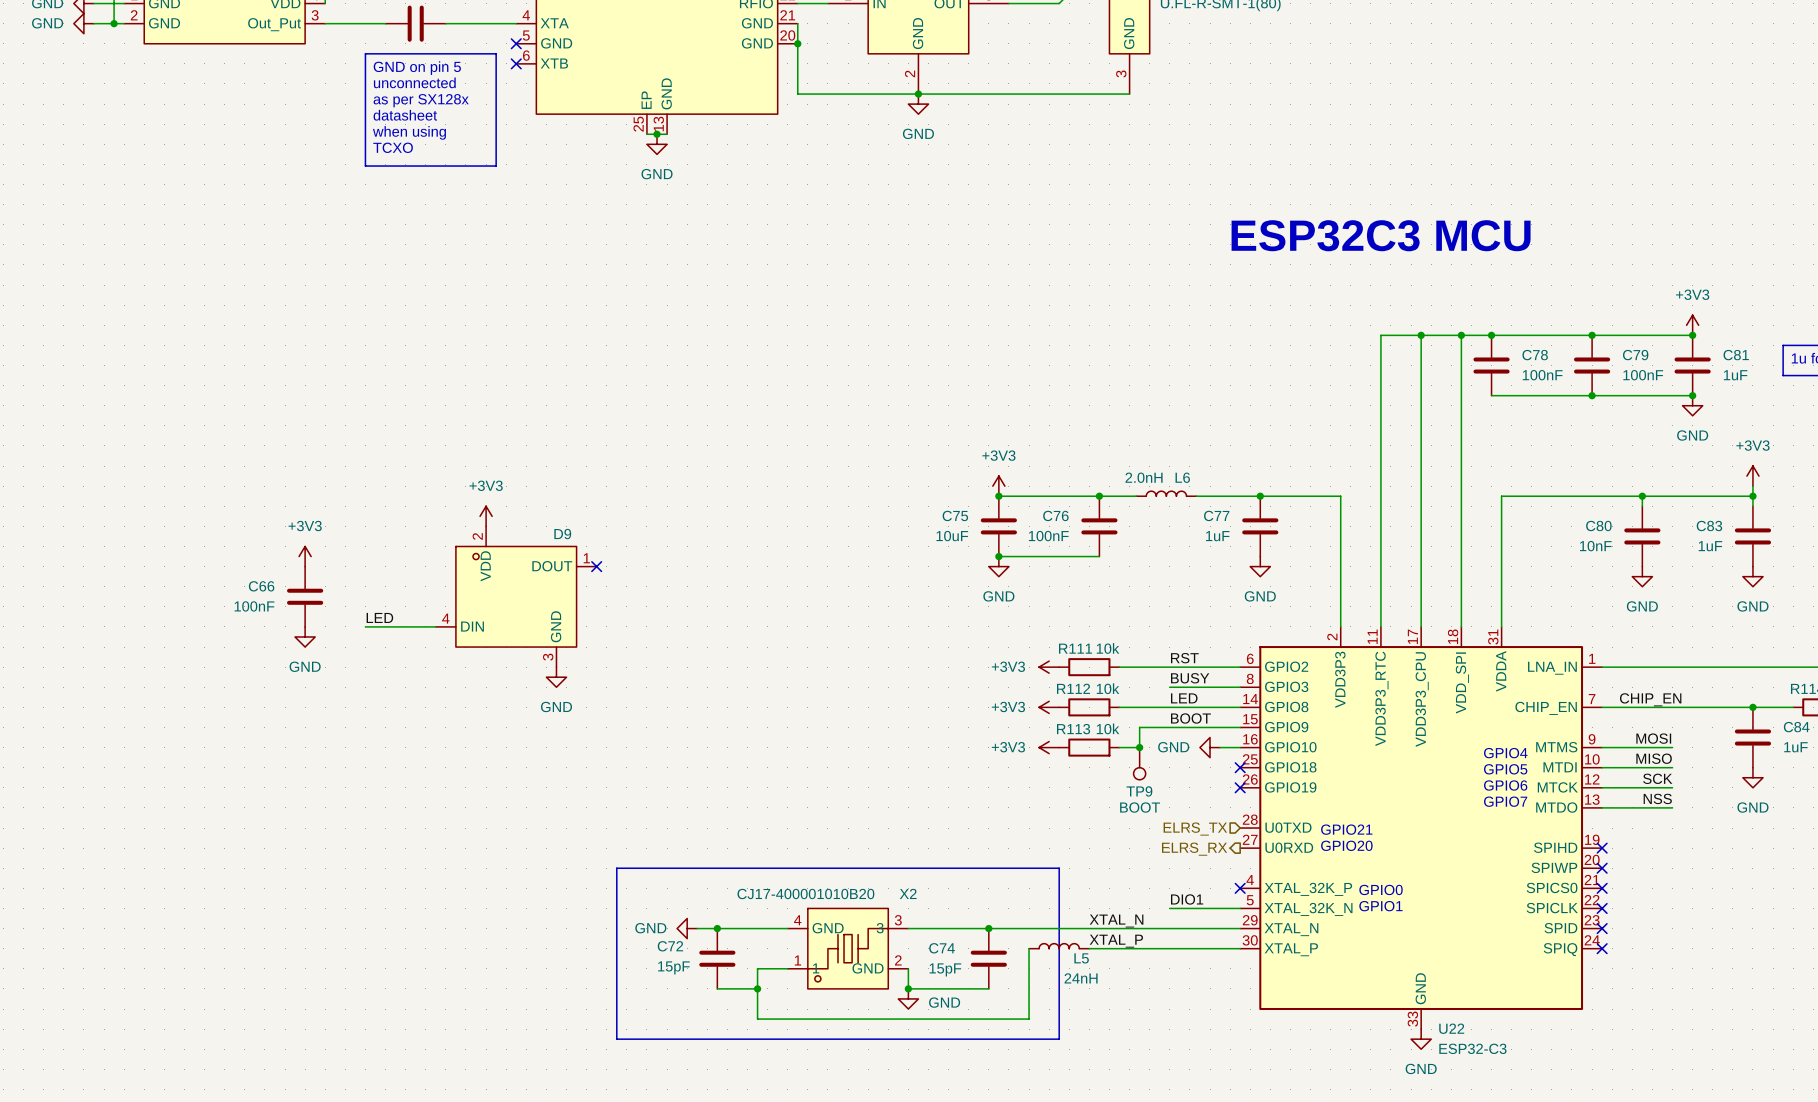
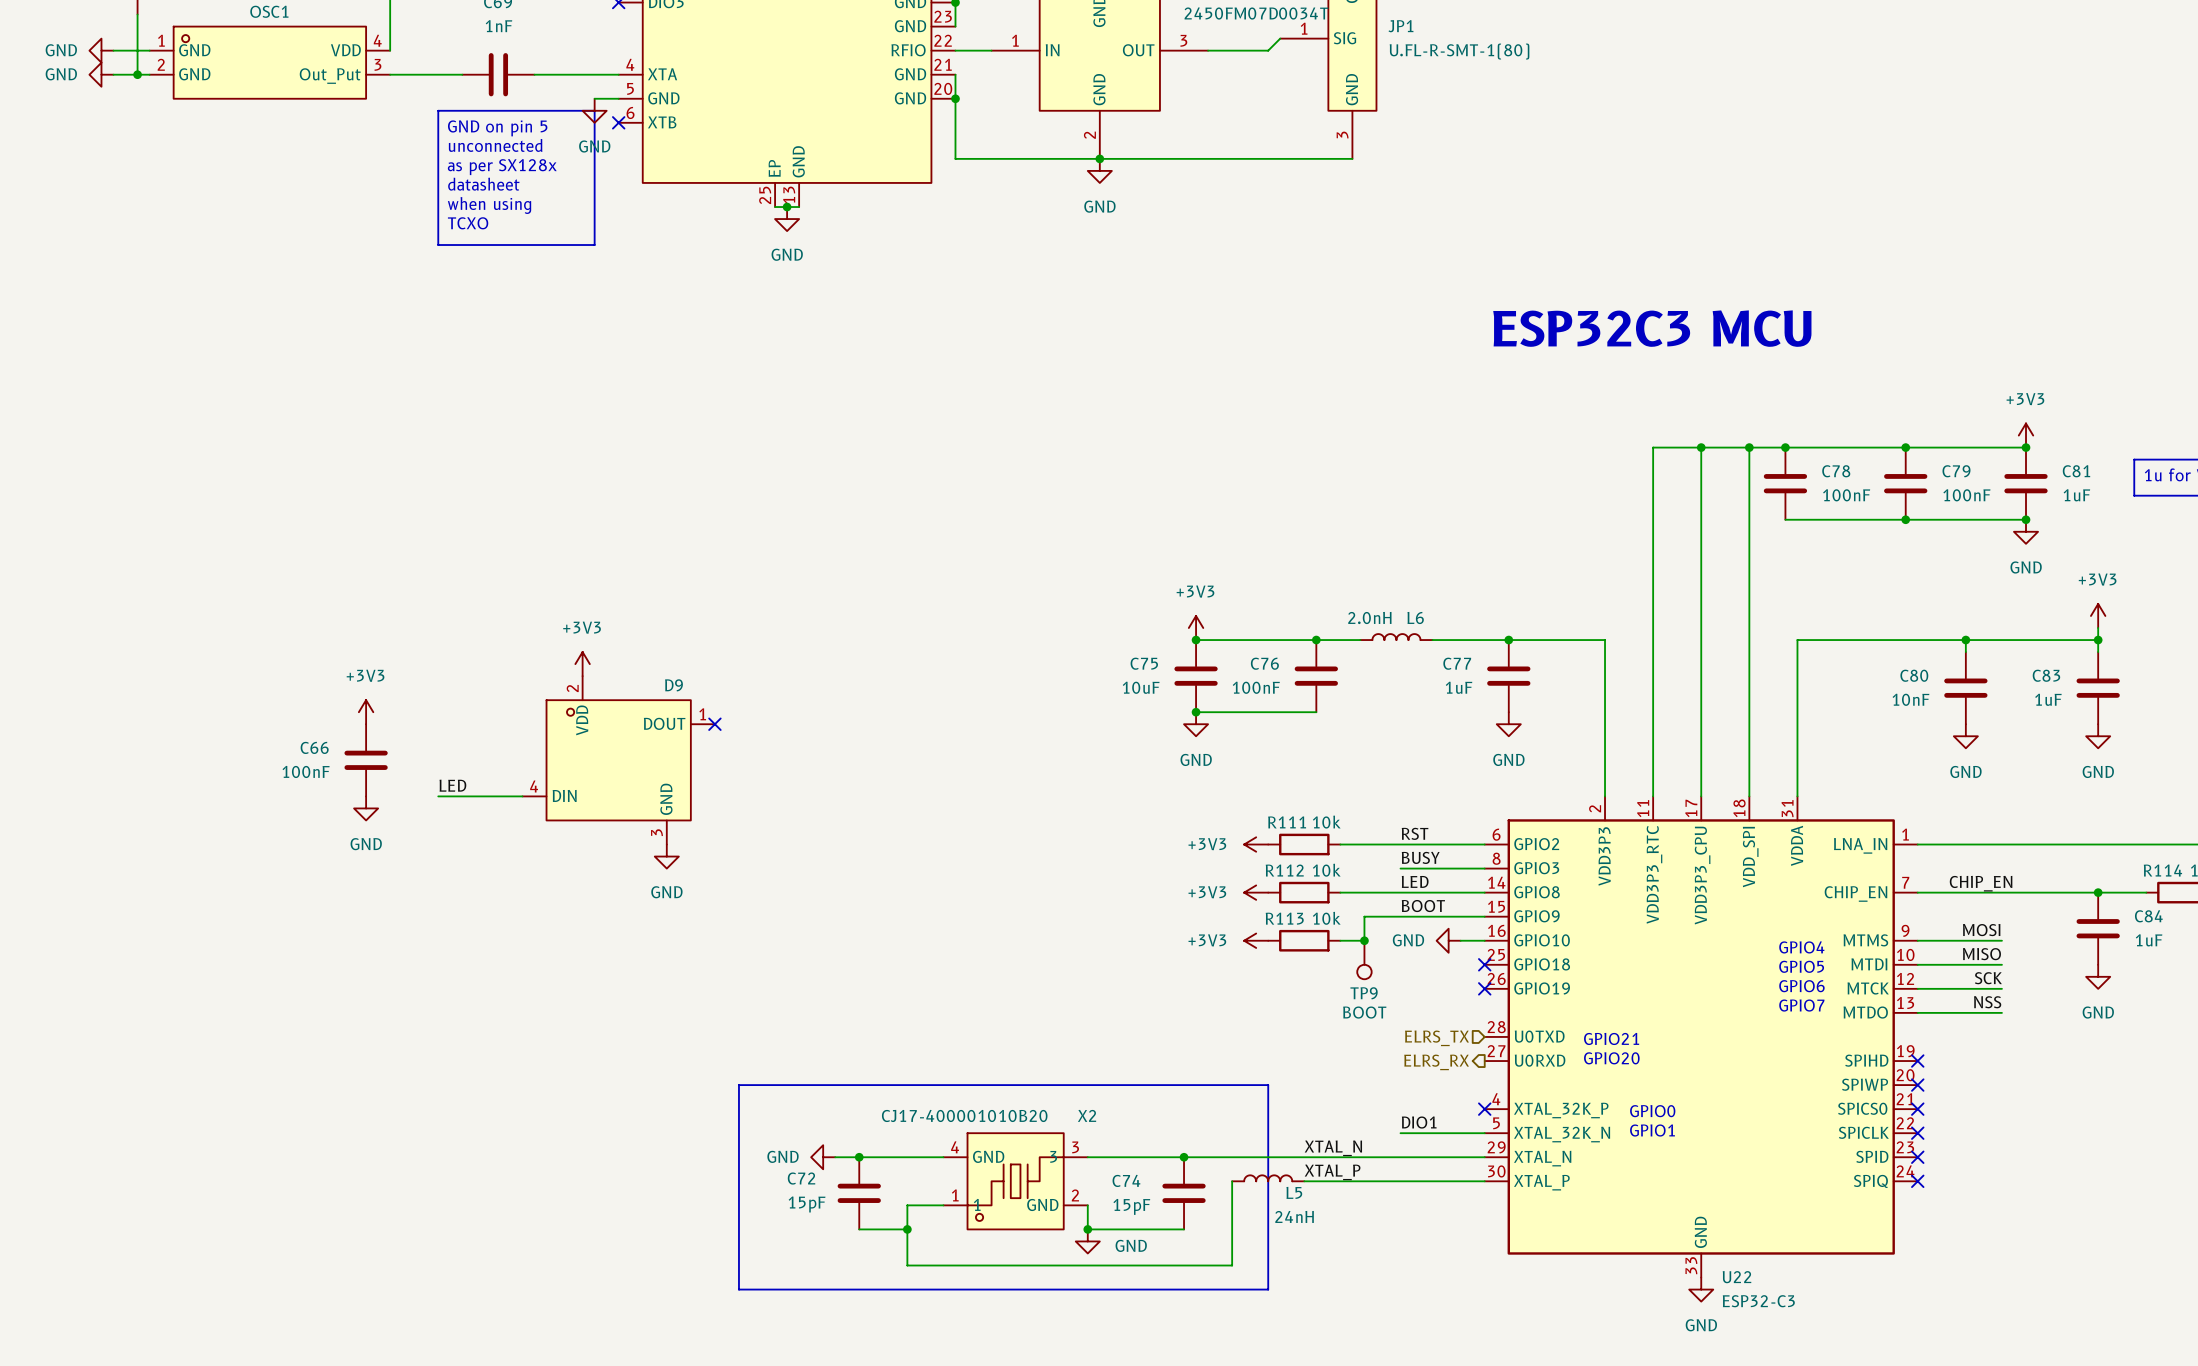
wire: none -> (594, 98) (618, 98)
no-connect mark: (516, 43) -> none
power symbol: none -> GND (594, 110)

